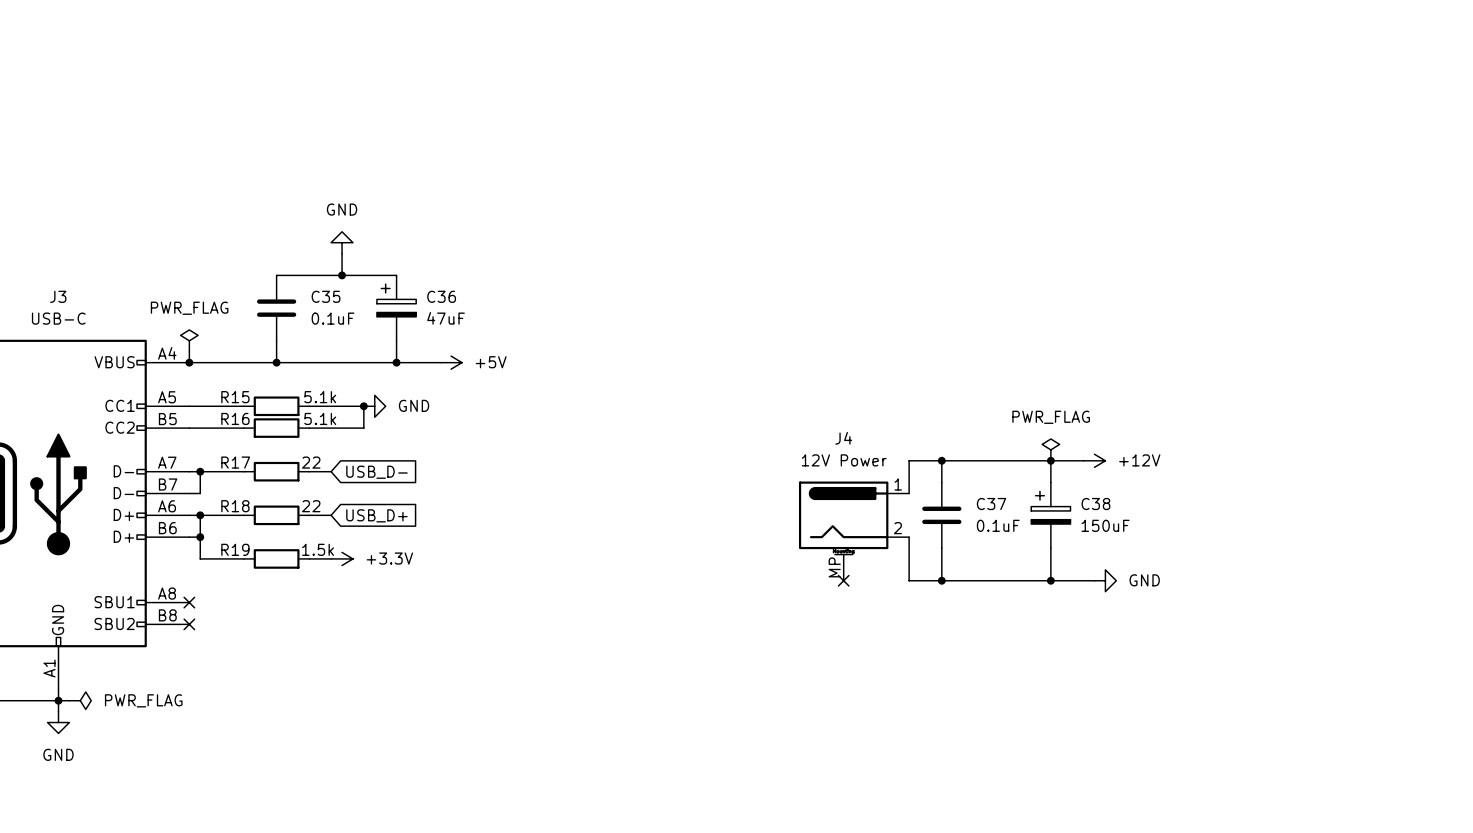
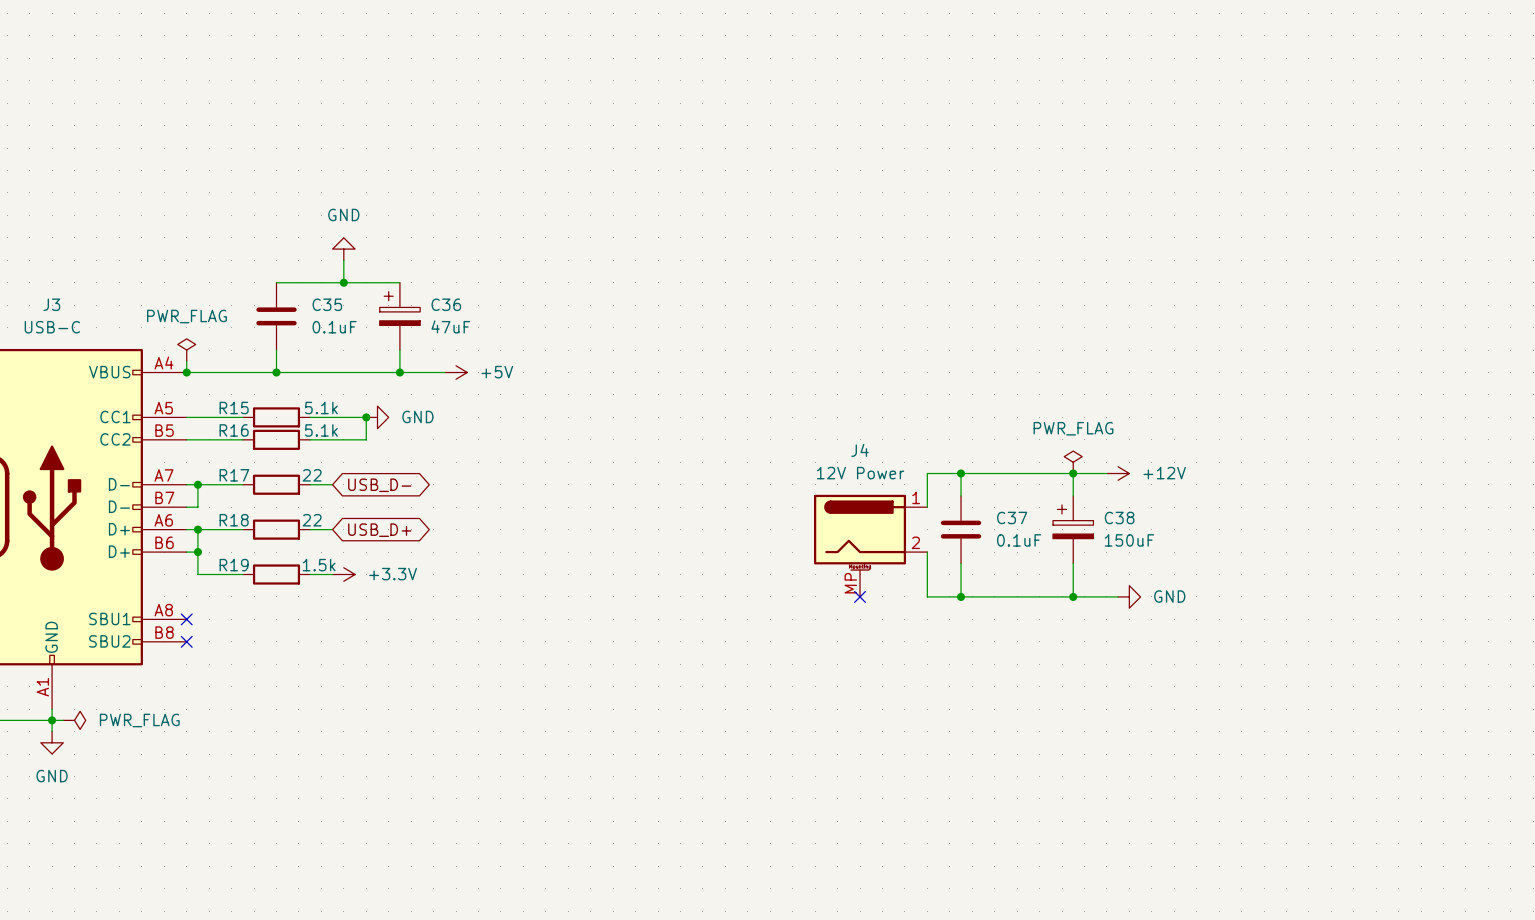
global label shape: input (376, 472) -> bidirectional (379, 485)
global label shape: input (376, 515) -> bidirectional (379, 530)

